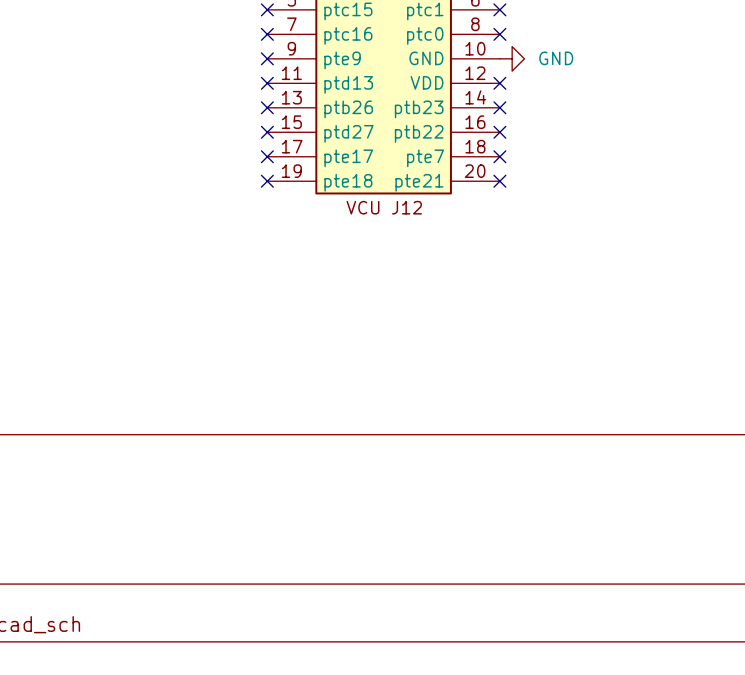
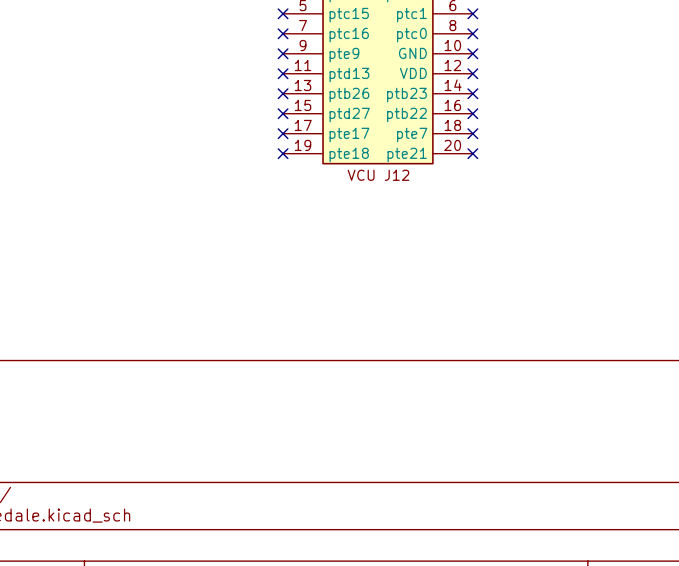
no-connect mark: none -> (472, 53)
power symbol: GND (512, 58) -> none

